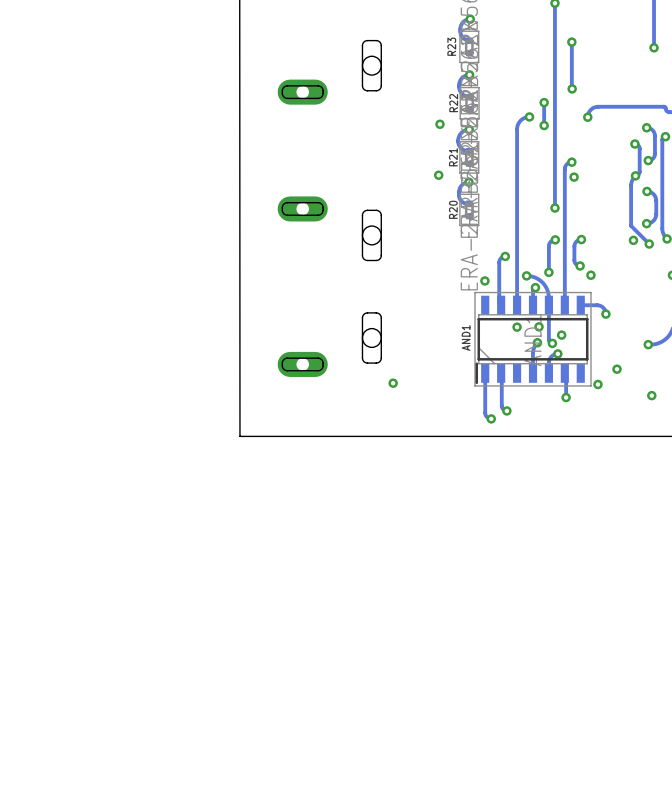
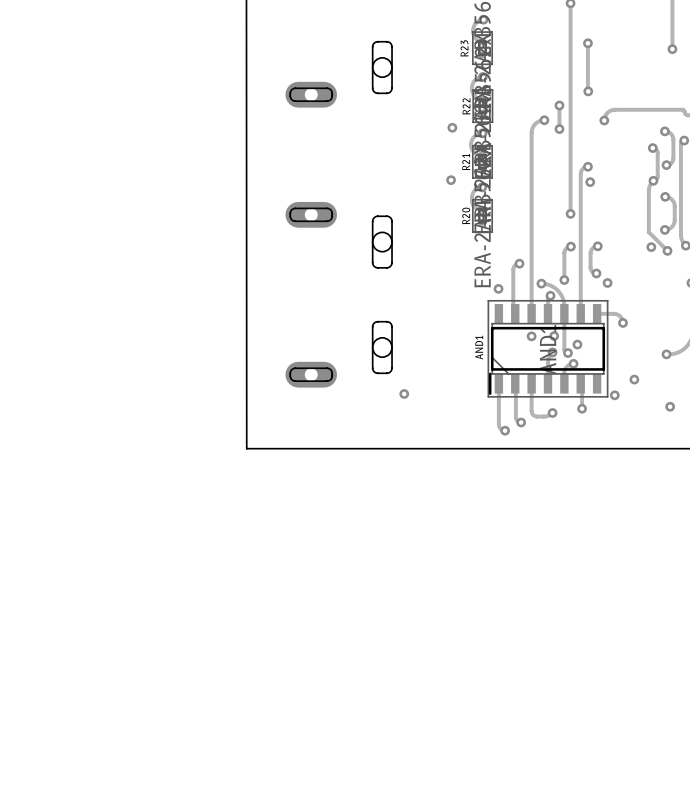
track: none -> (531, 383) (532, 414) (536, 416) (545, 416) (552, 412)
via: none -> (552, 412)

